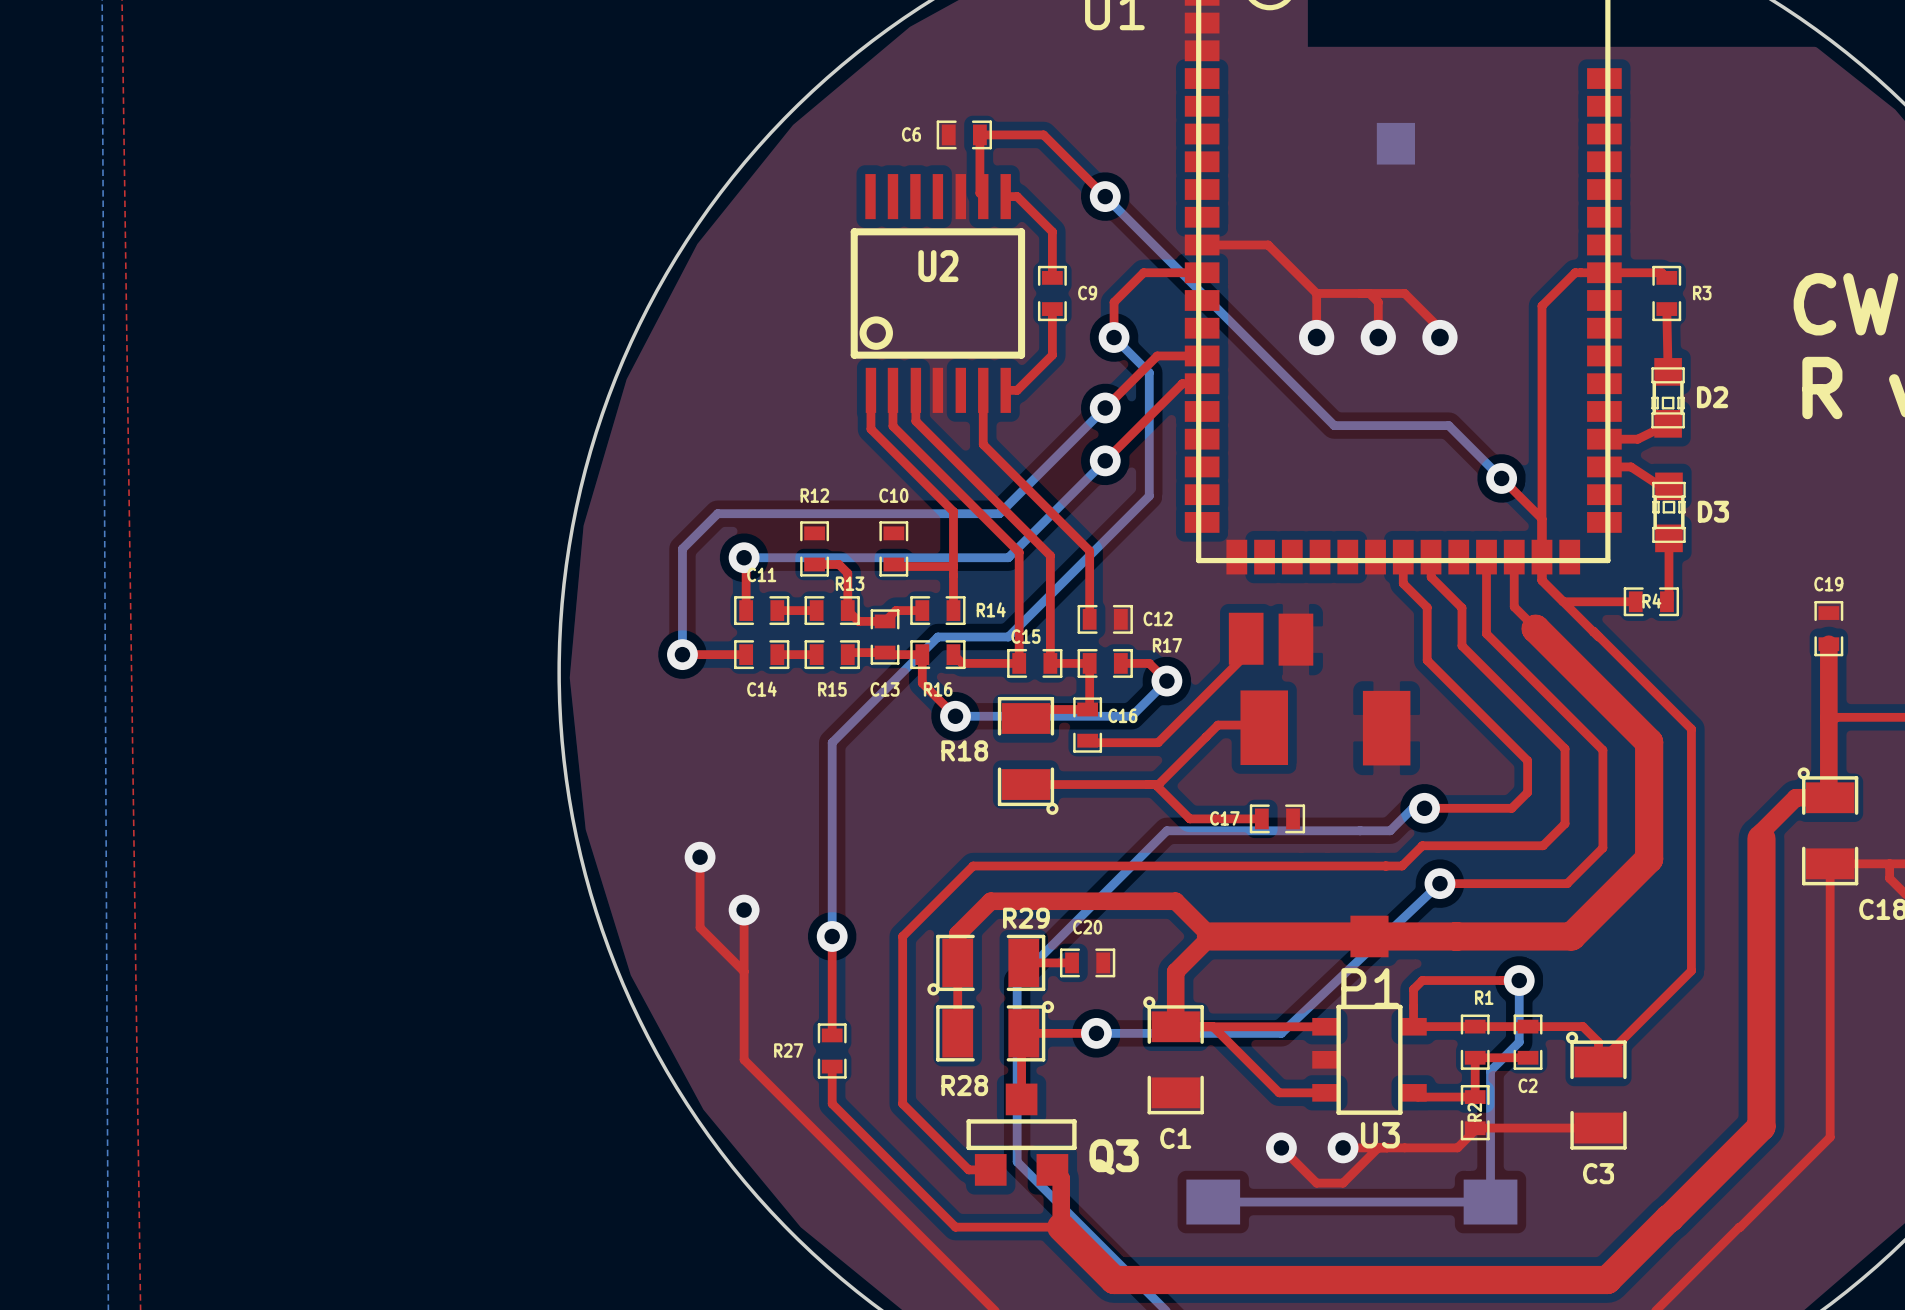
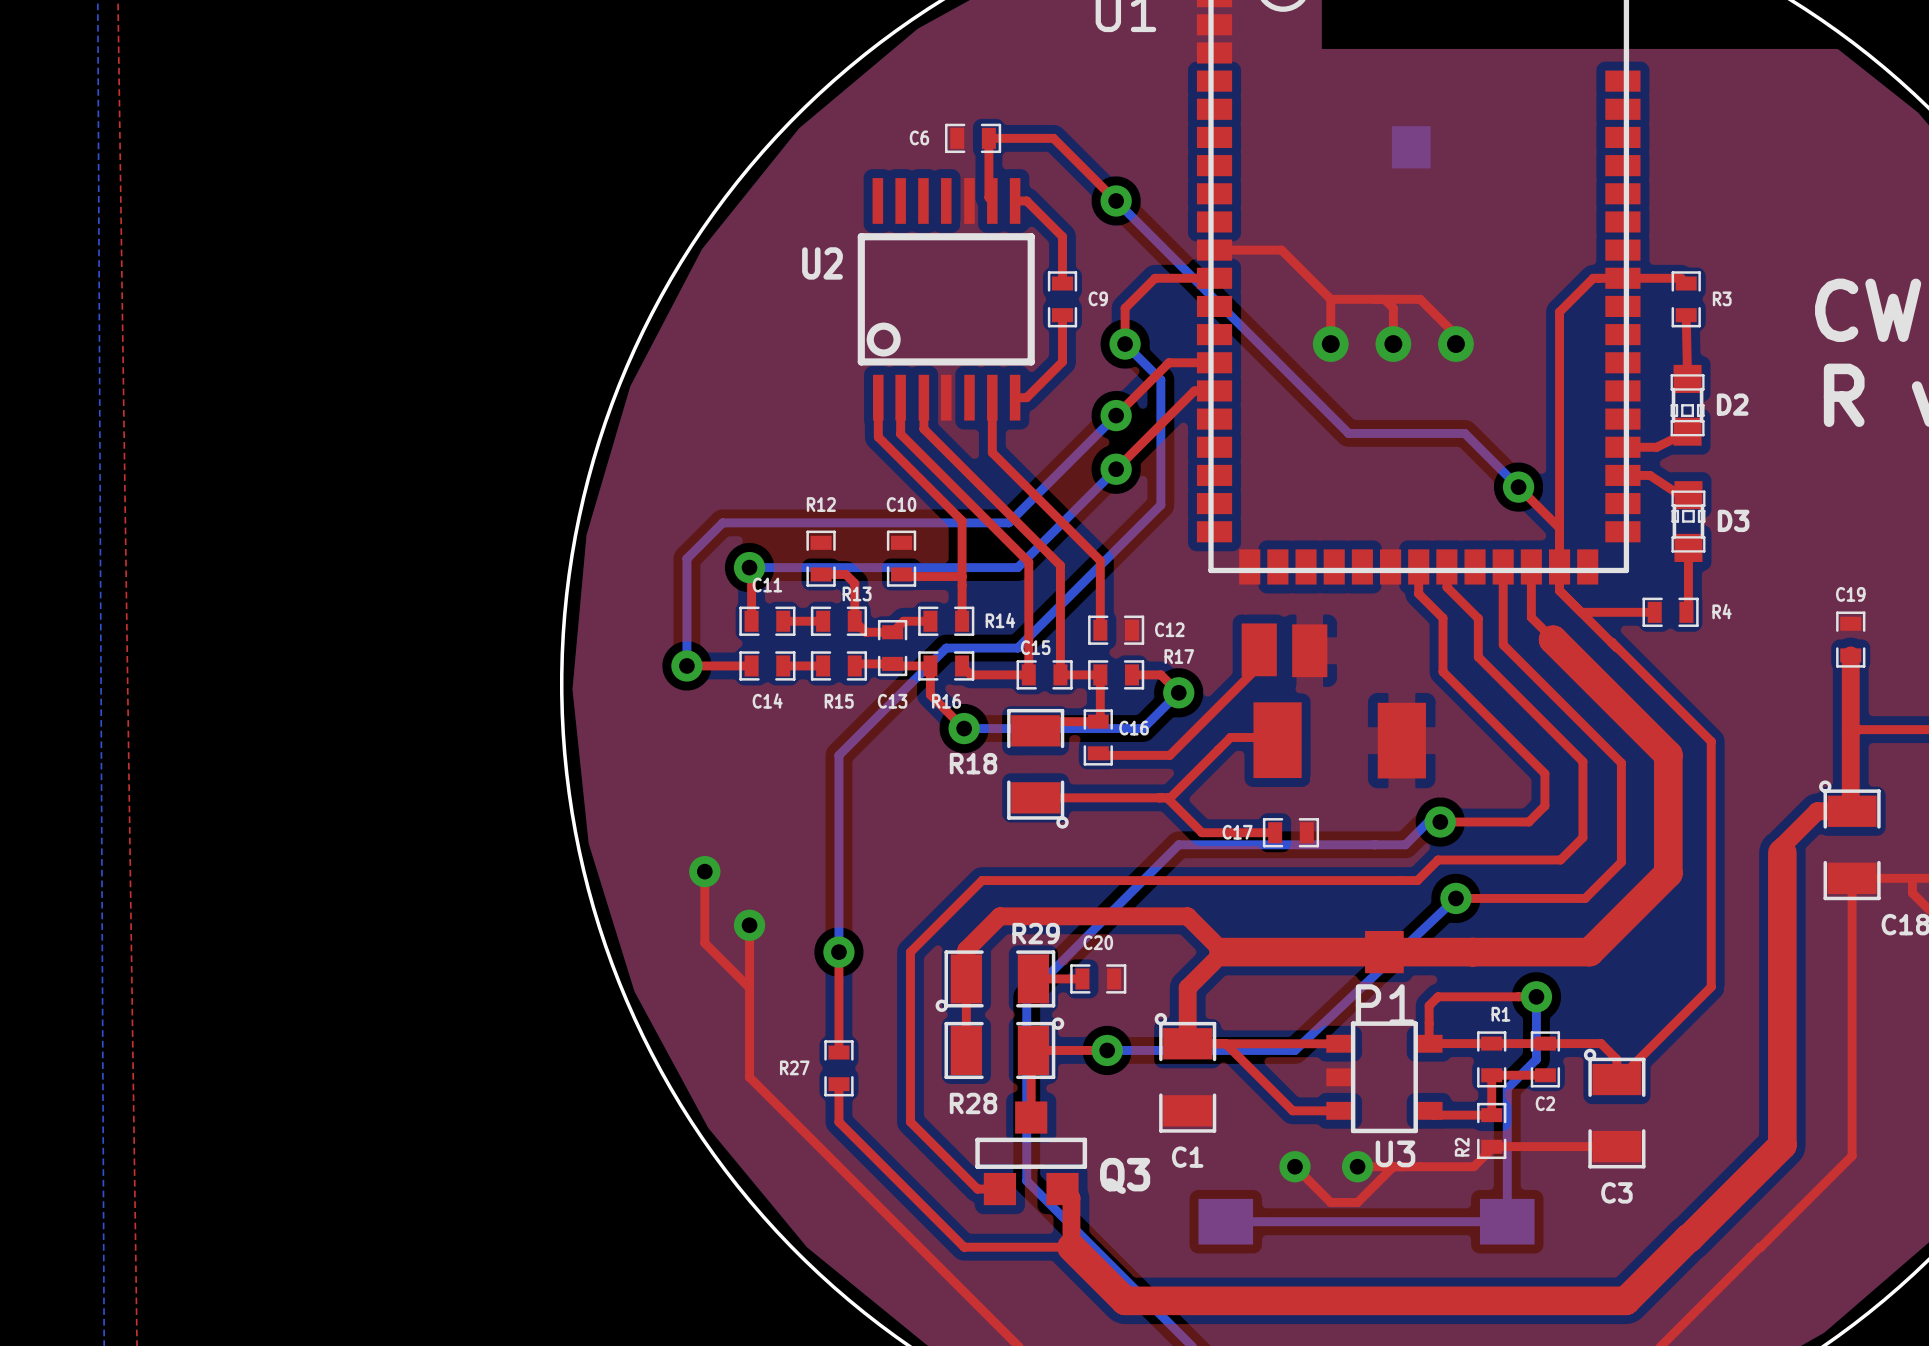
U2 name position: U2 (938, 266) -> U2 (822, 263)
R4 name position: R4 (1651, 601) -> R4 (1722, 611)
R2 name position: R2 (1474, 1112) -> R2 (1462, 1147)

